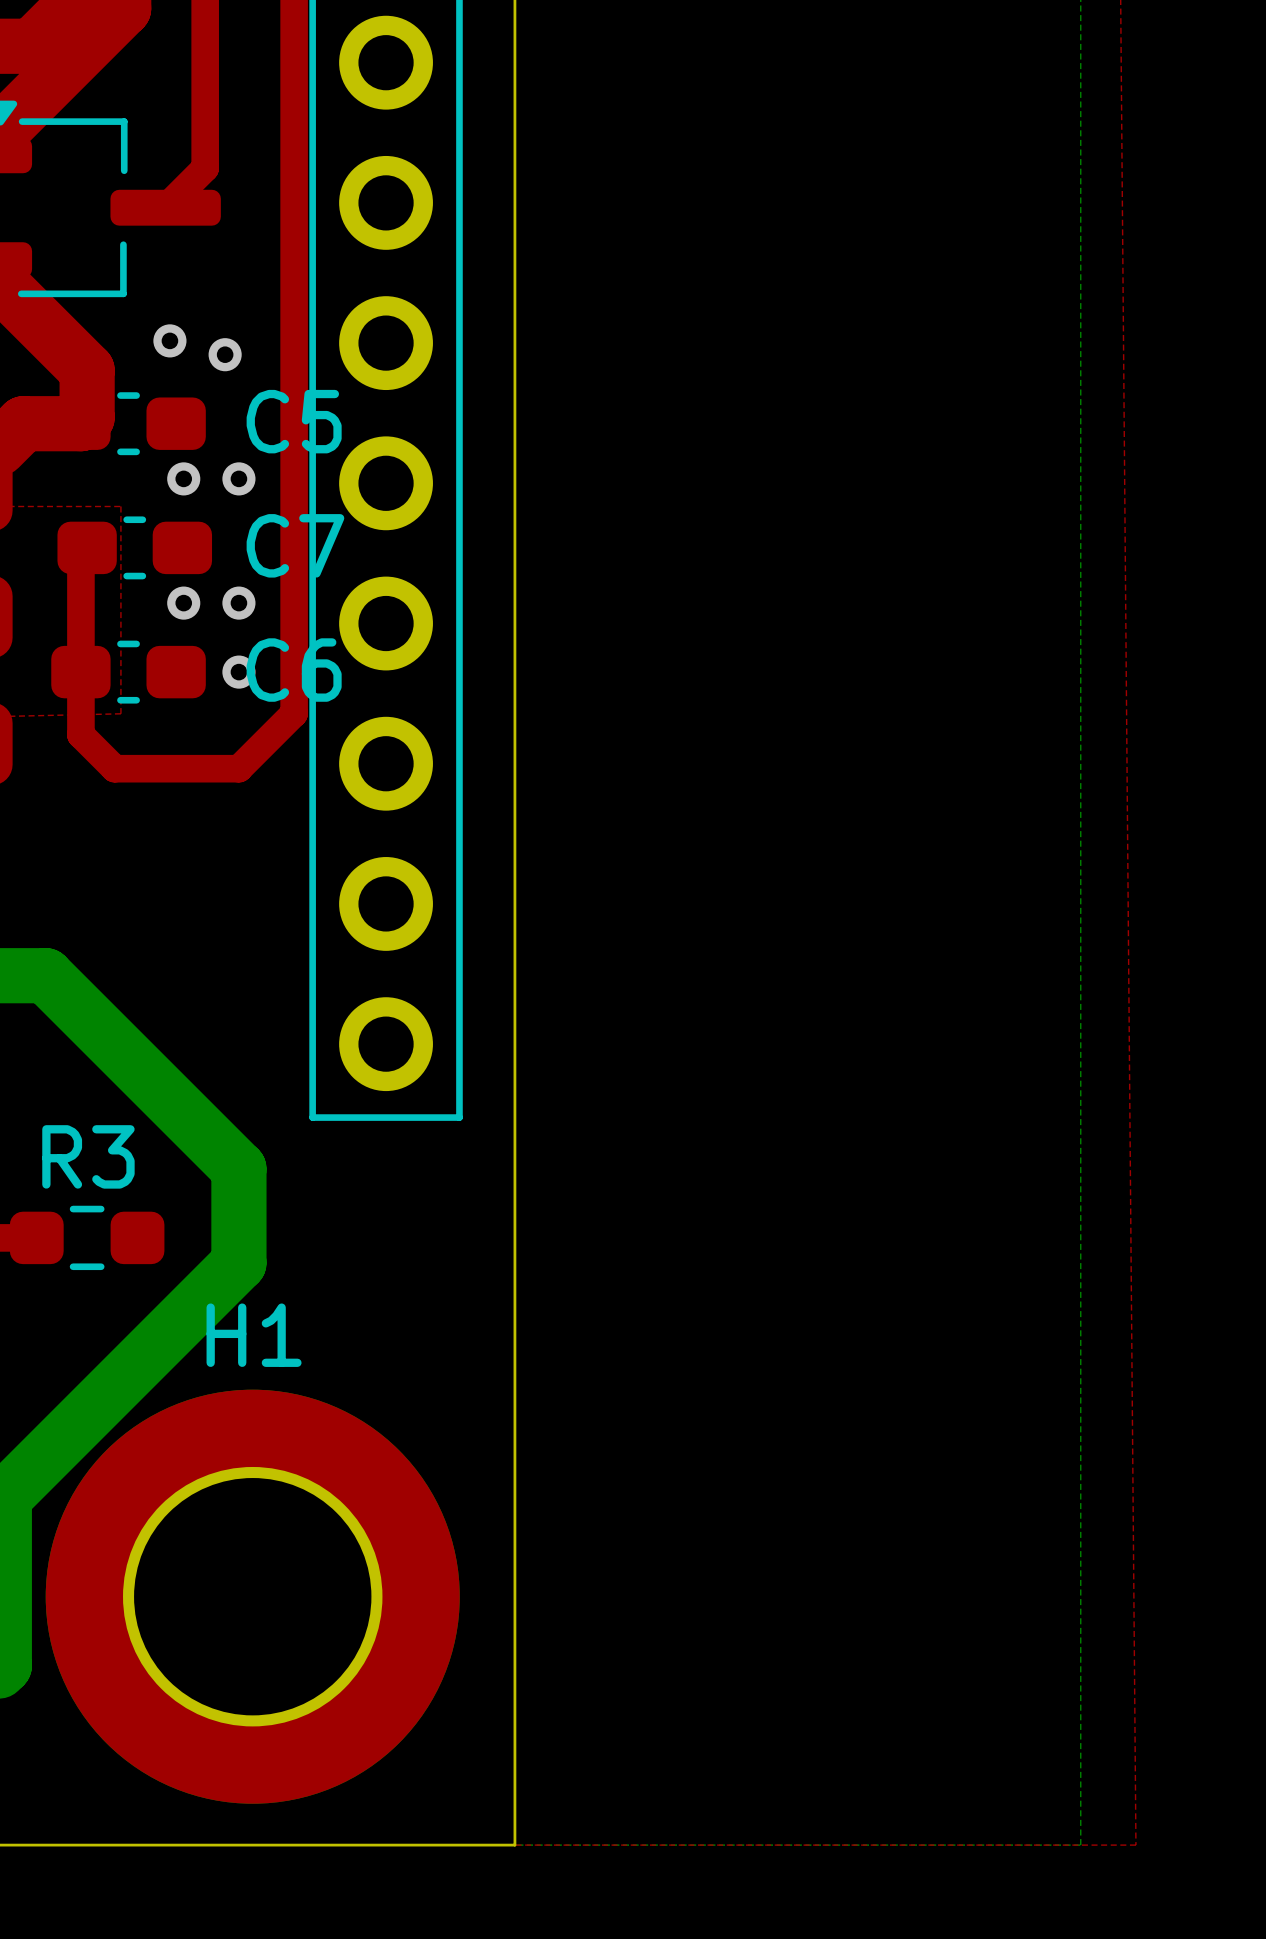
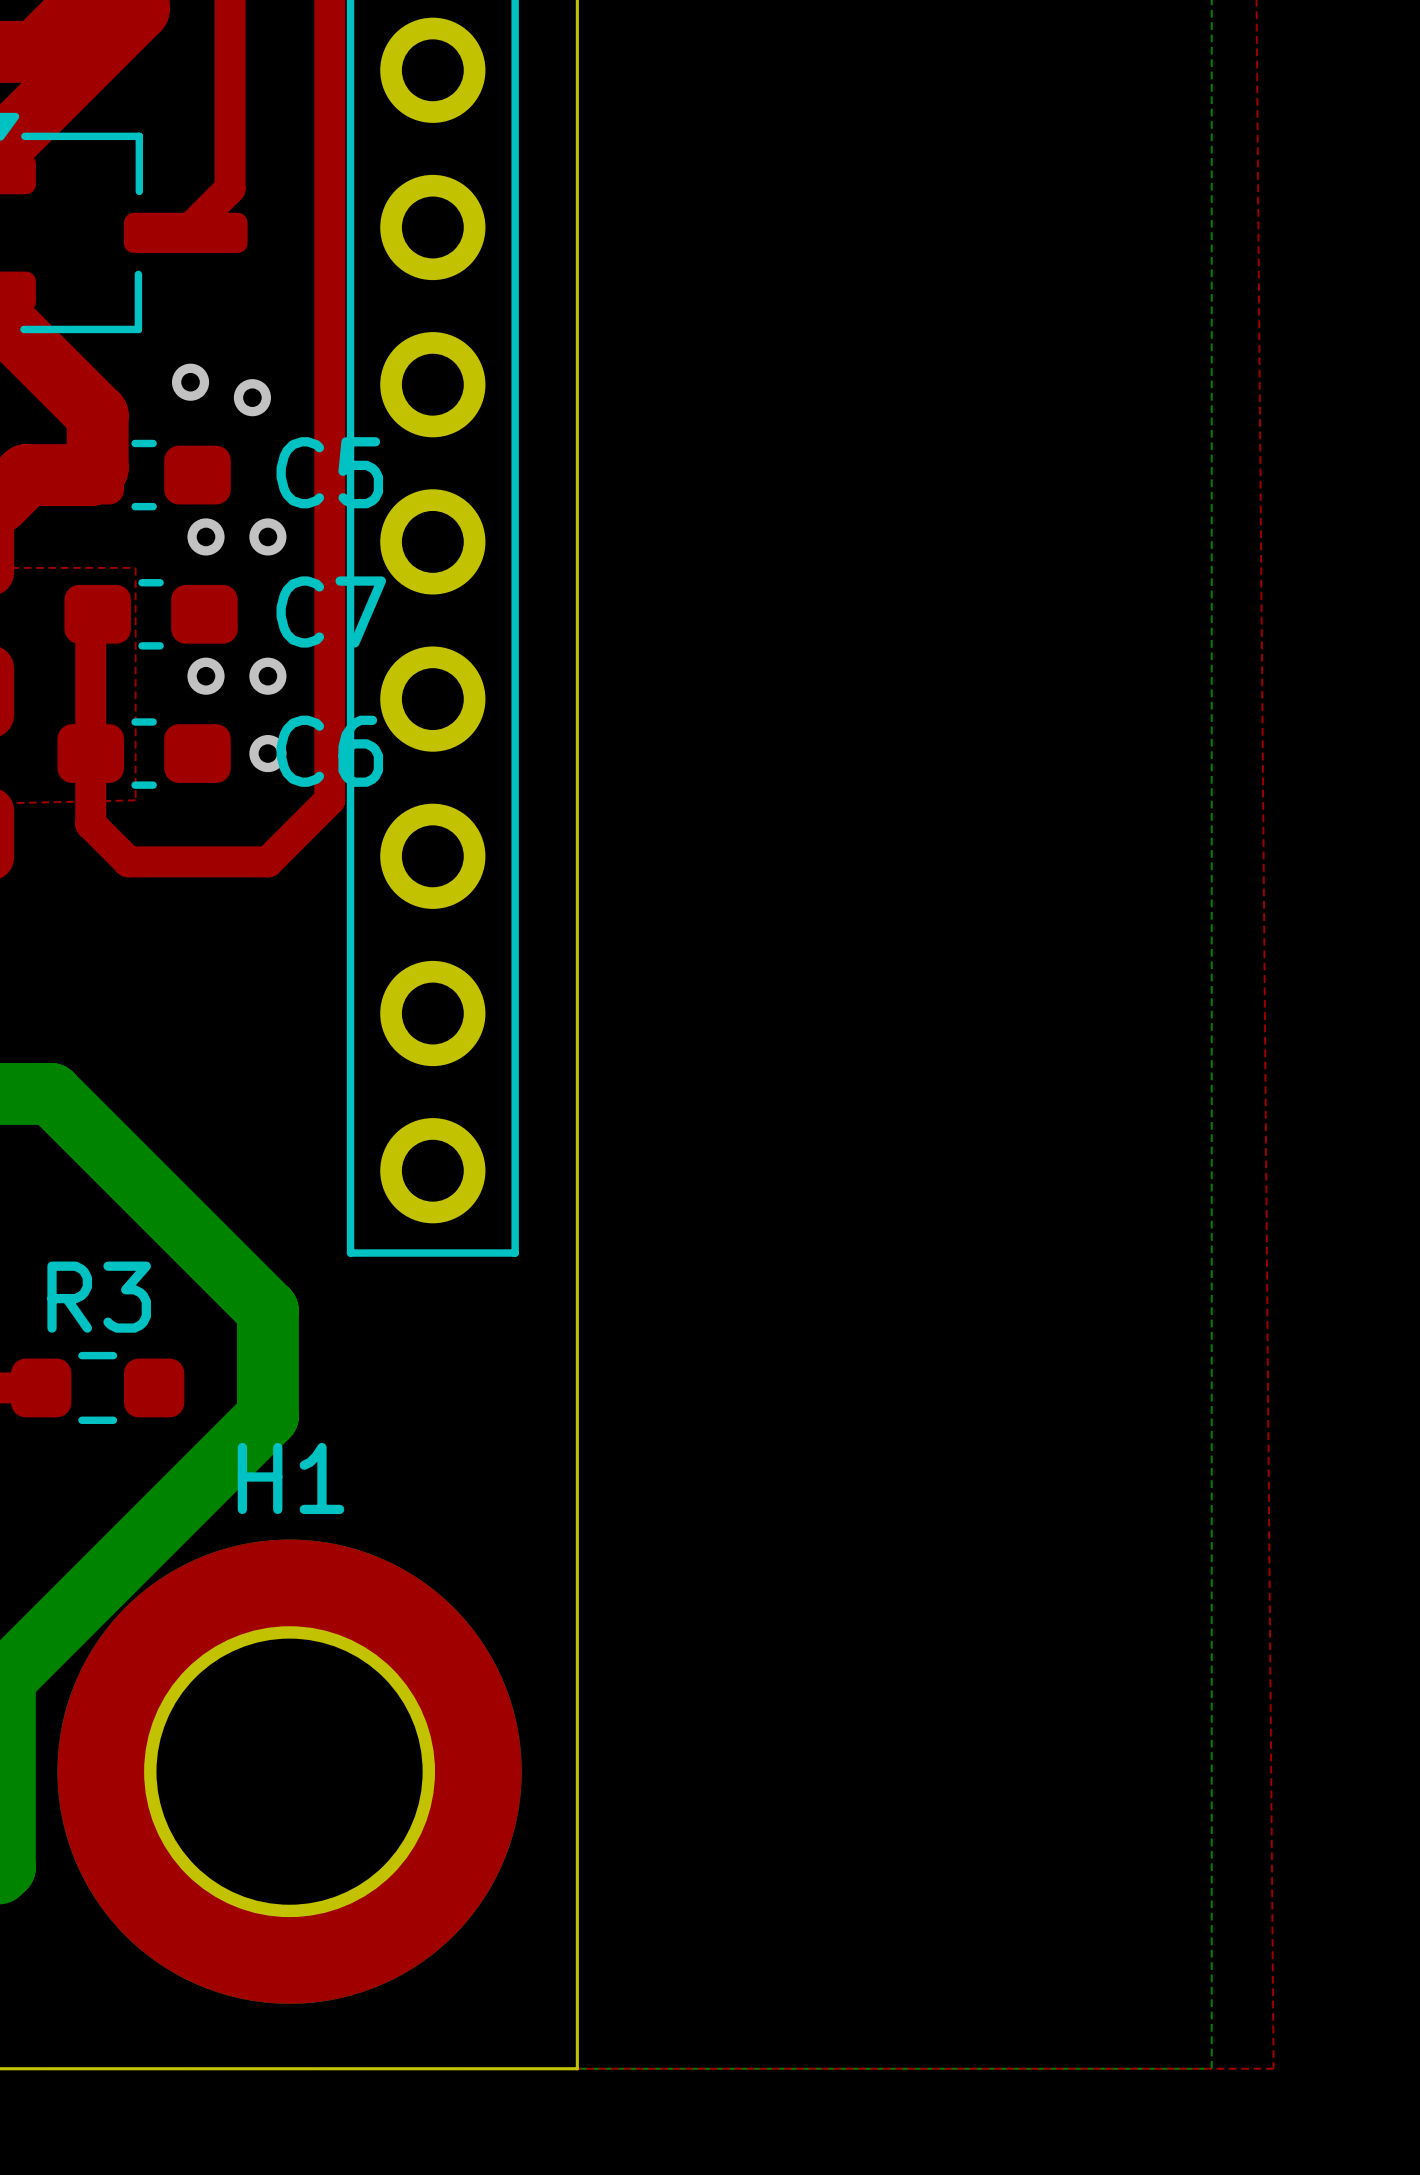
H1 position: (252, 1596) -> (289, 1771)

